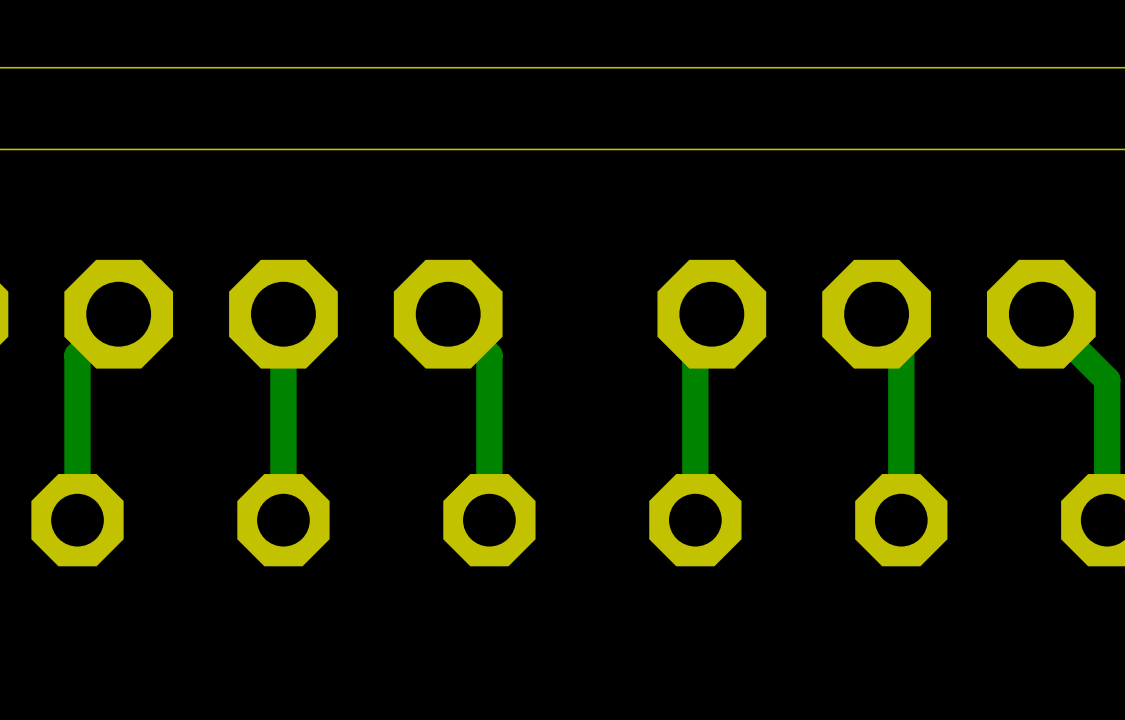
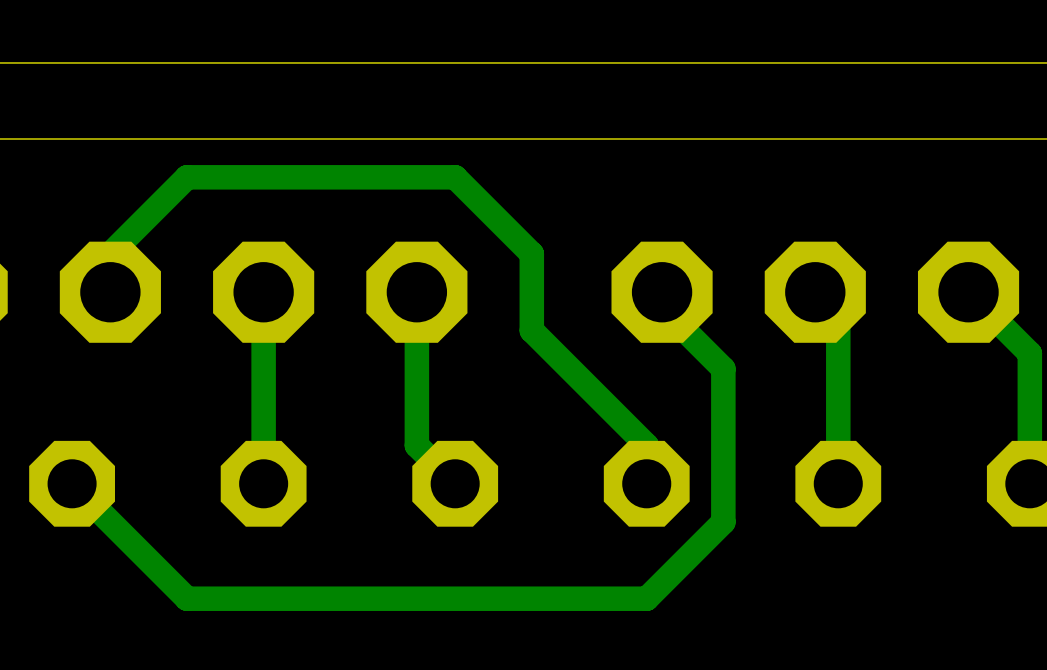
bottom track: (118, 314) (77, 355) (77, 520) -> (662, 292) (662, 307) (723, 368) (723, 522) (646, 598) (187, 598) (72, 483)
bottom track: (448, 314) (489, 355) (489, 520) -> (416, 292) (416, 445) (455, 483)
bottom track: (711, 314) (695, 330) (695, 478) -> (110, 292) (110, 253) (187, 177) (455, 177) (531, 253) (531, 330) (646, 445)

